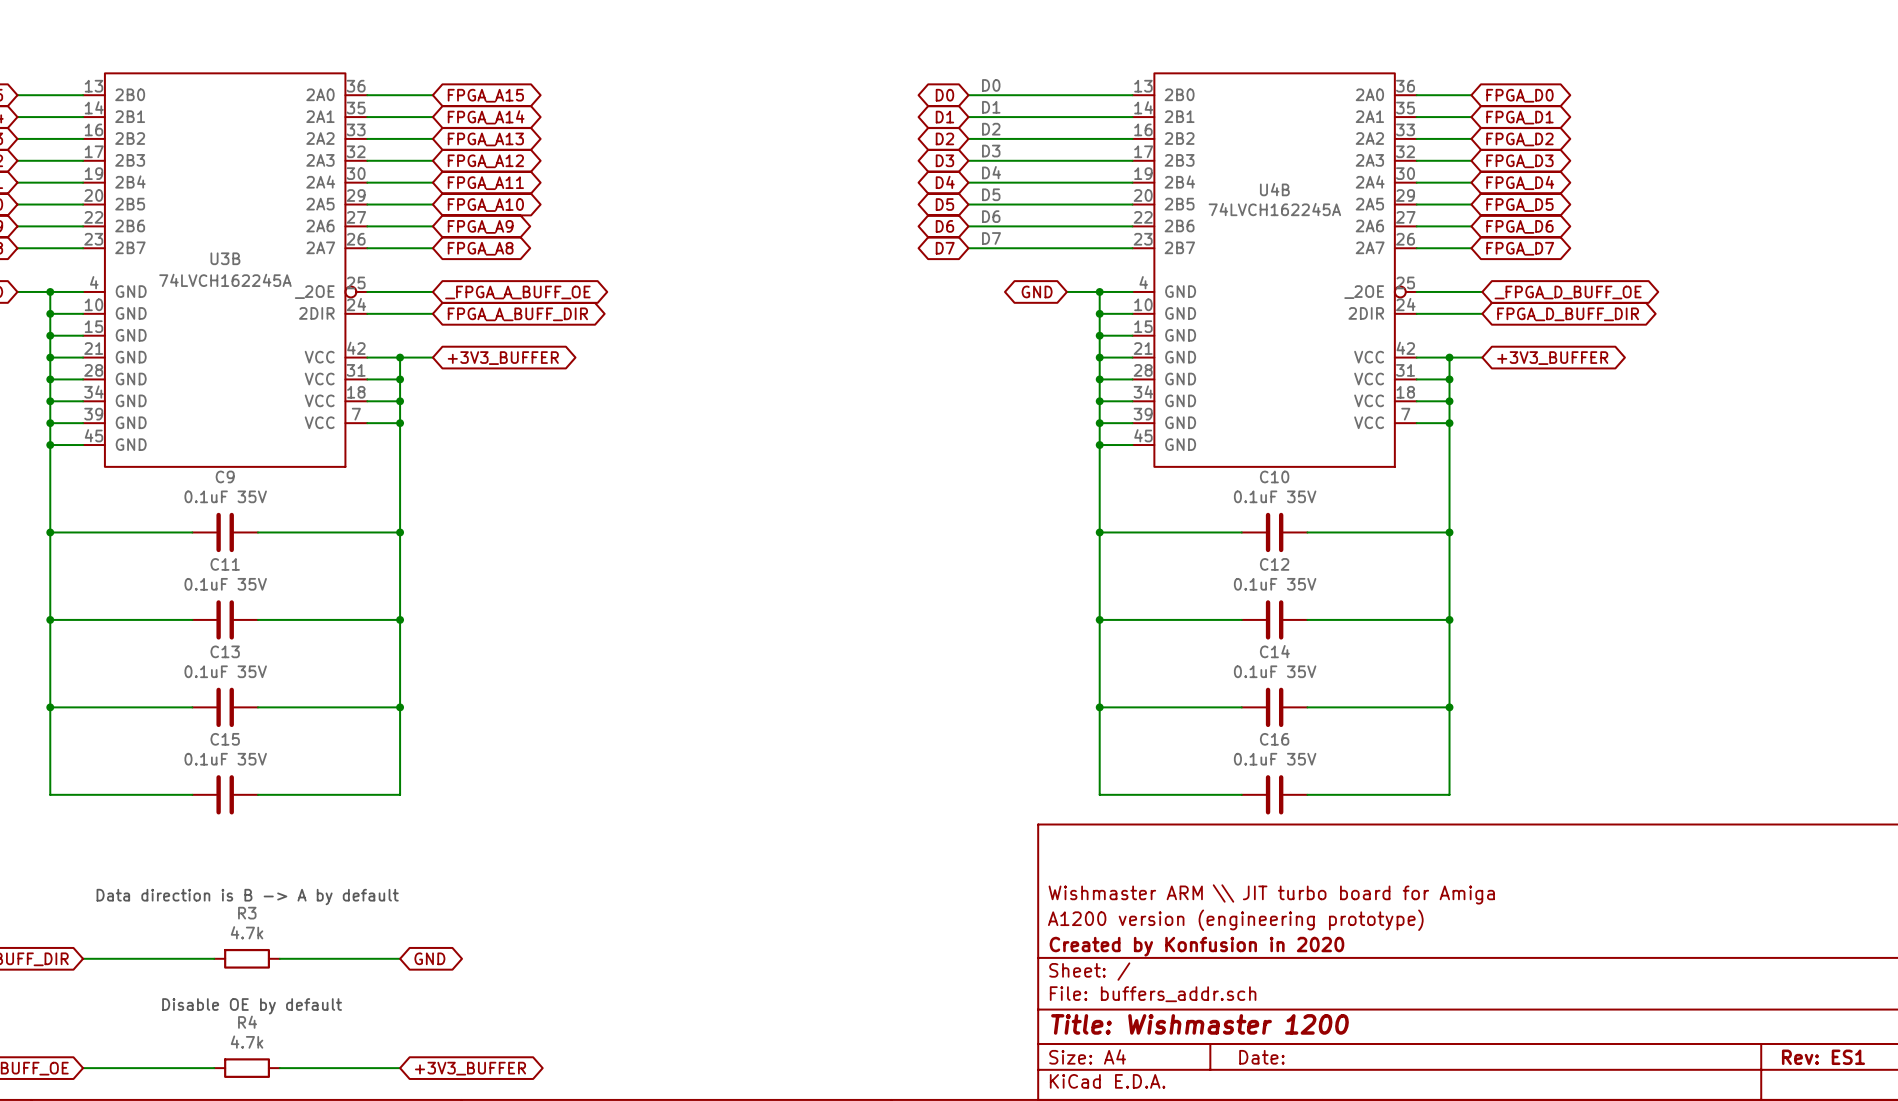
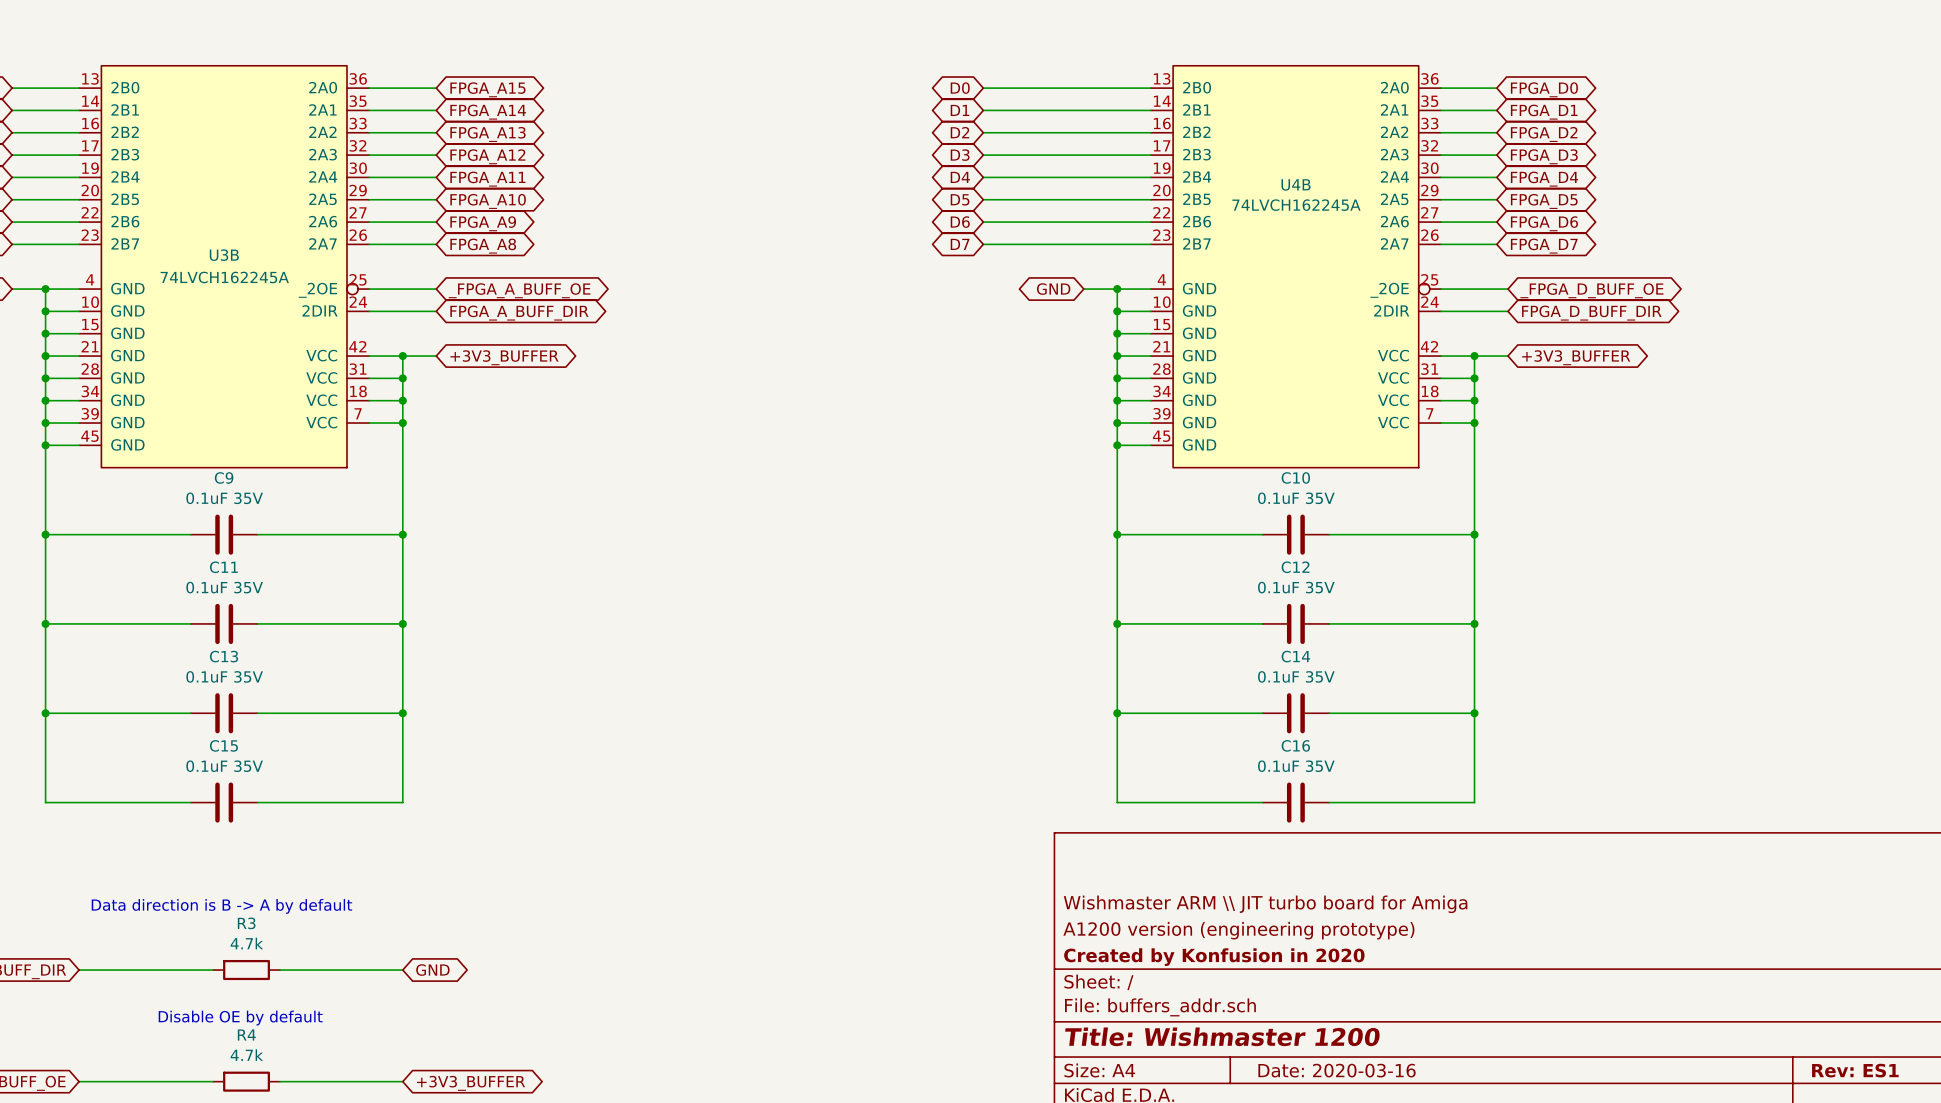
label: D0 (991, 85) -> none
label: D1 (991, 107) -> none
label: D2 (991, 129) -> none
label: D3 (991, 151) -> none
label: D4 (991, 172) -> none
label: D5 (991, 194) -> none
label: D6 (991, 216) -> none
label: D7 (991, 238) -> none
title block: Date: (1261, 1057) -> Date: 2020-03-16 (1337, 1070)

